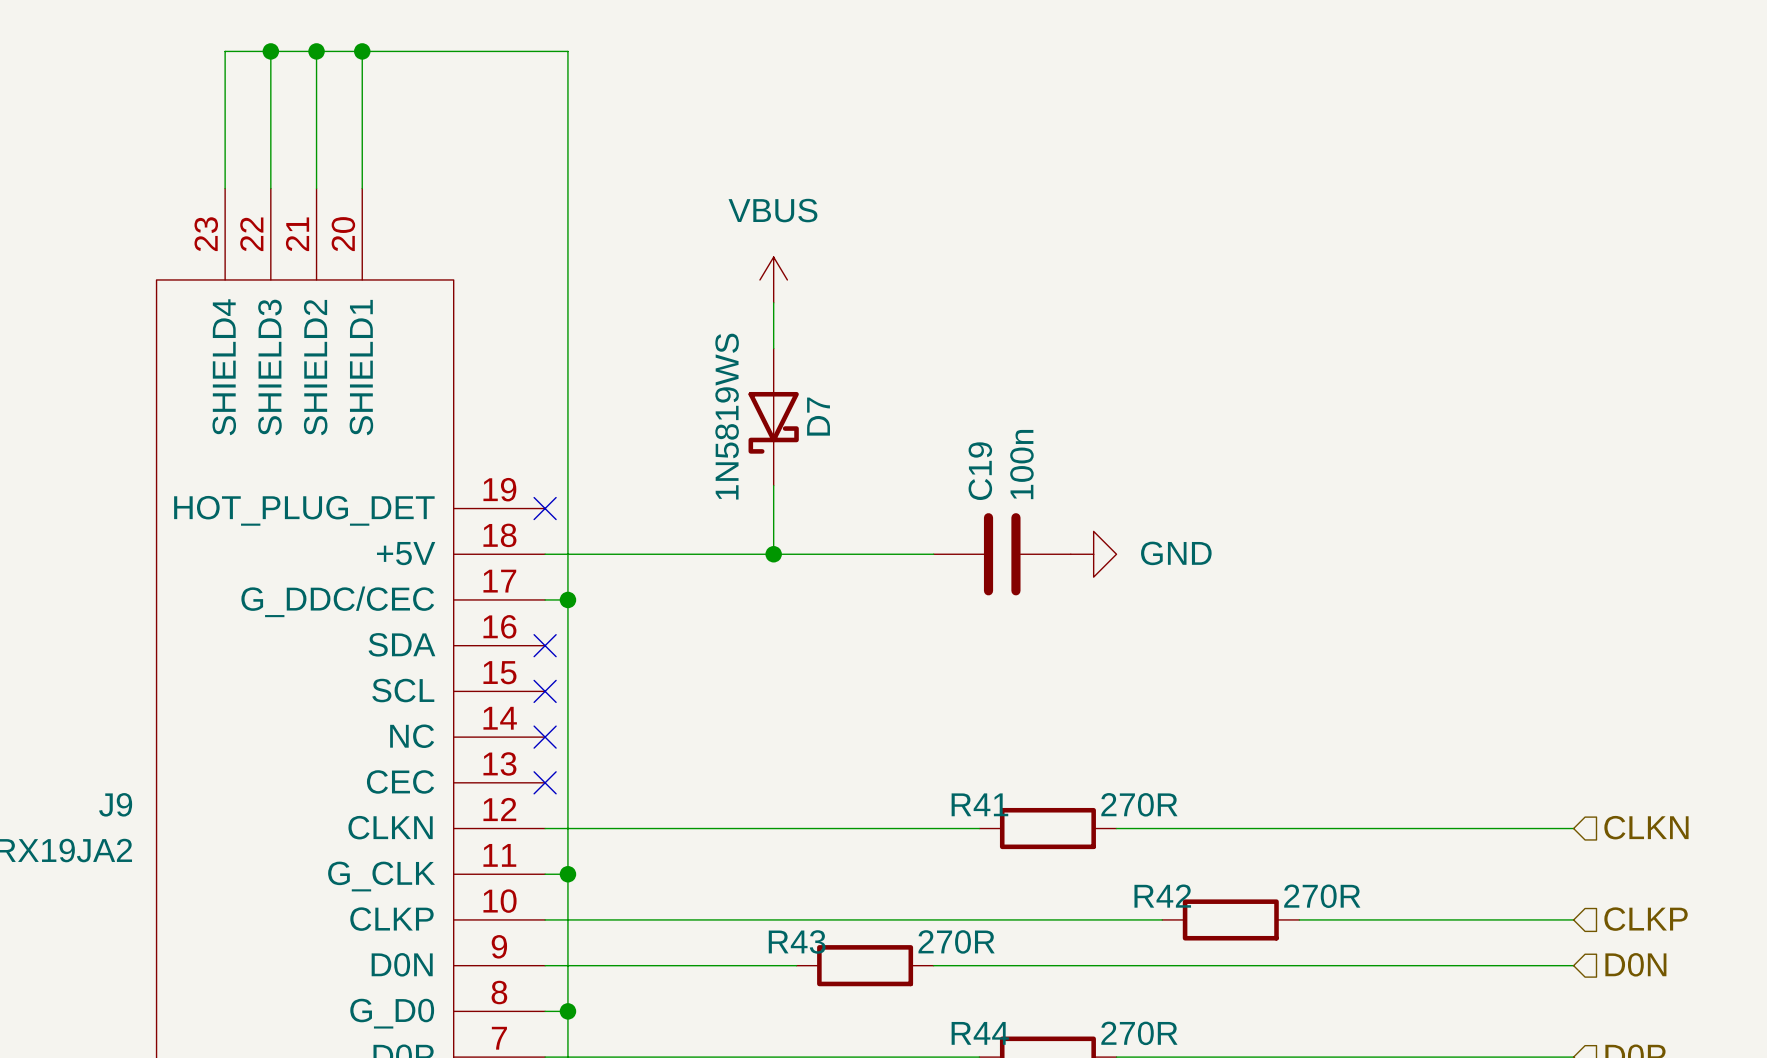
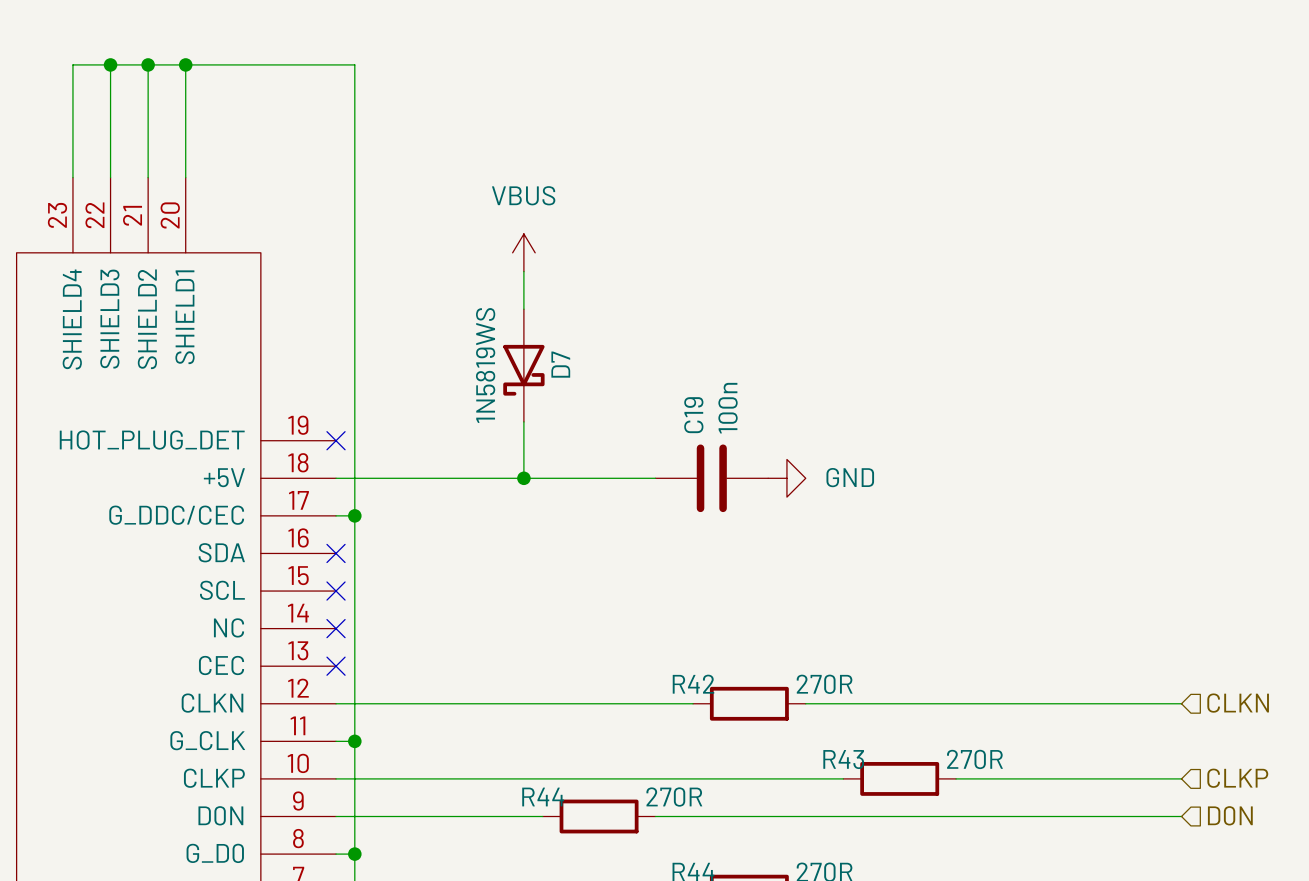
R41 name: R41 (979, 804) -> R42 (693, 684)
R42 name: R42 (1162, 896) -> R43 (843, 759)
R43 name: R43 (797, 941) -> R44 (543, 797)

